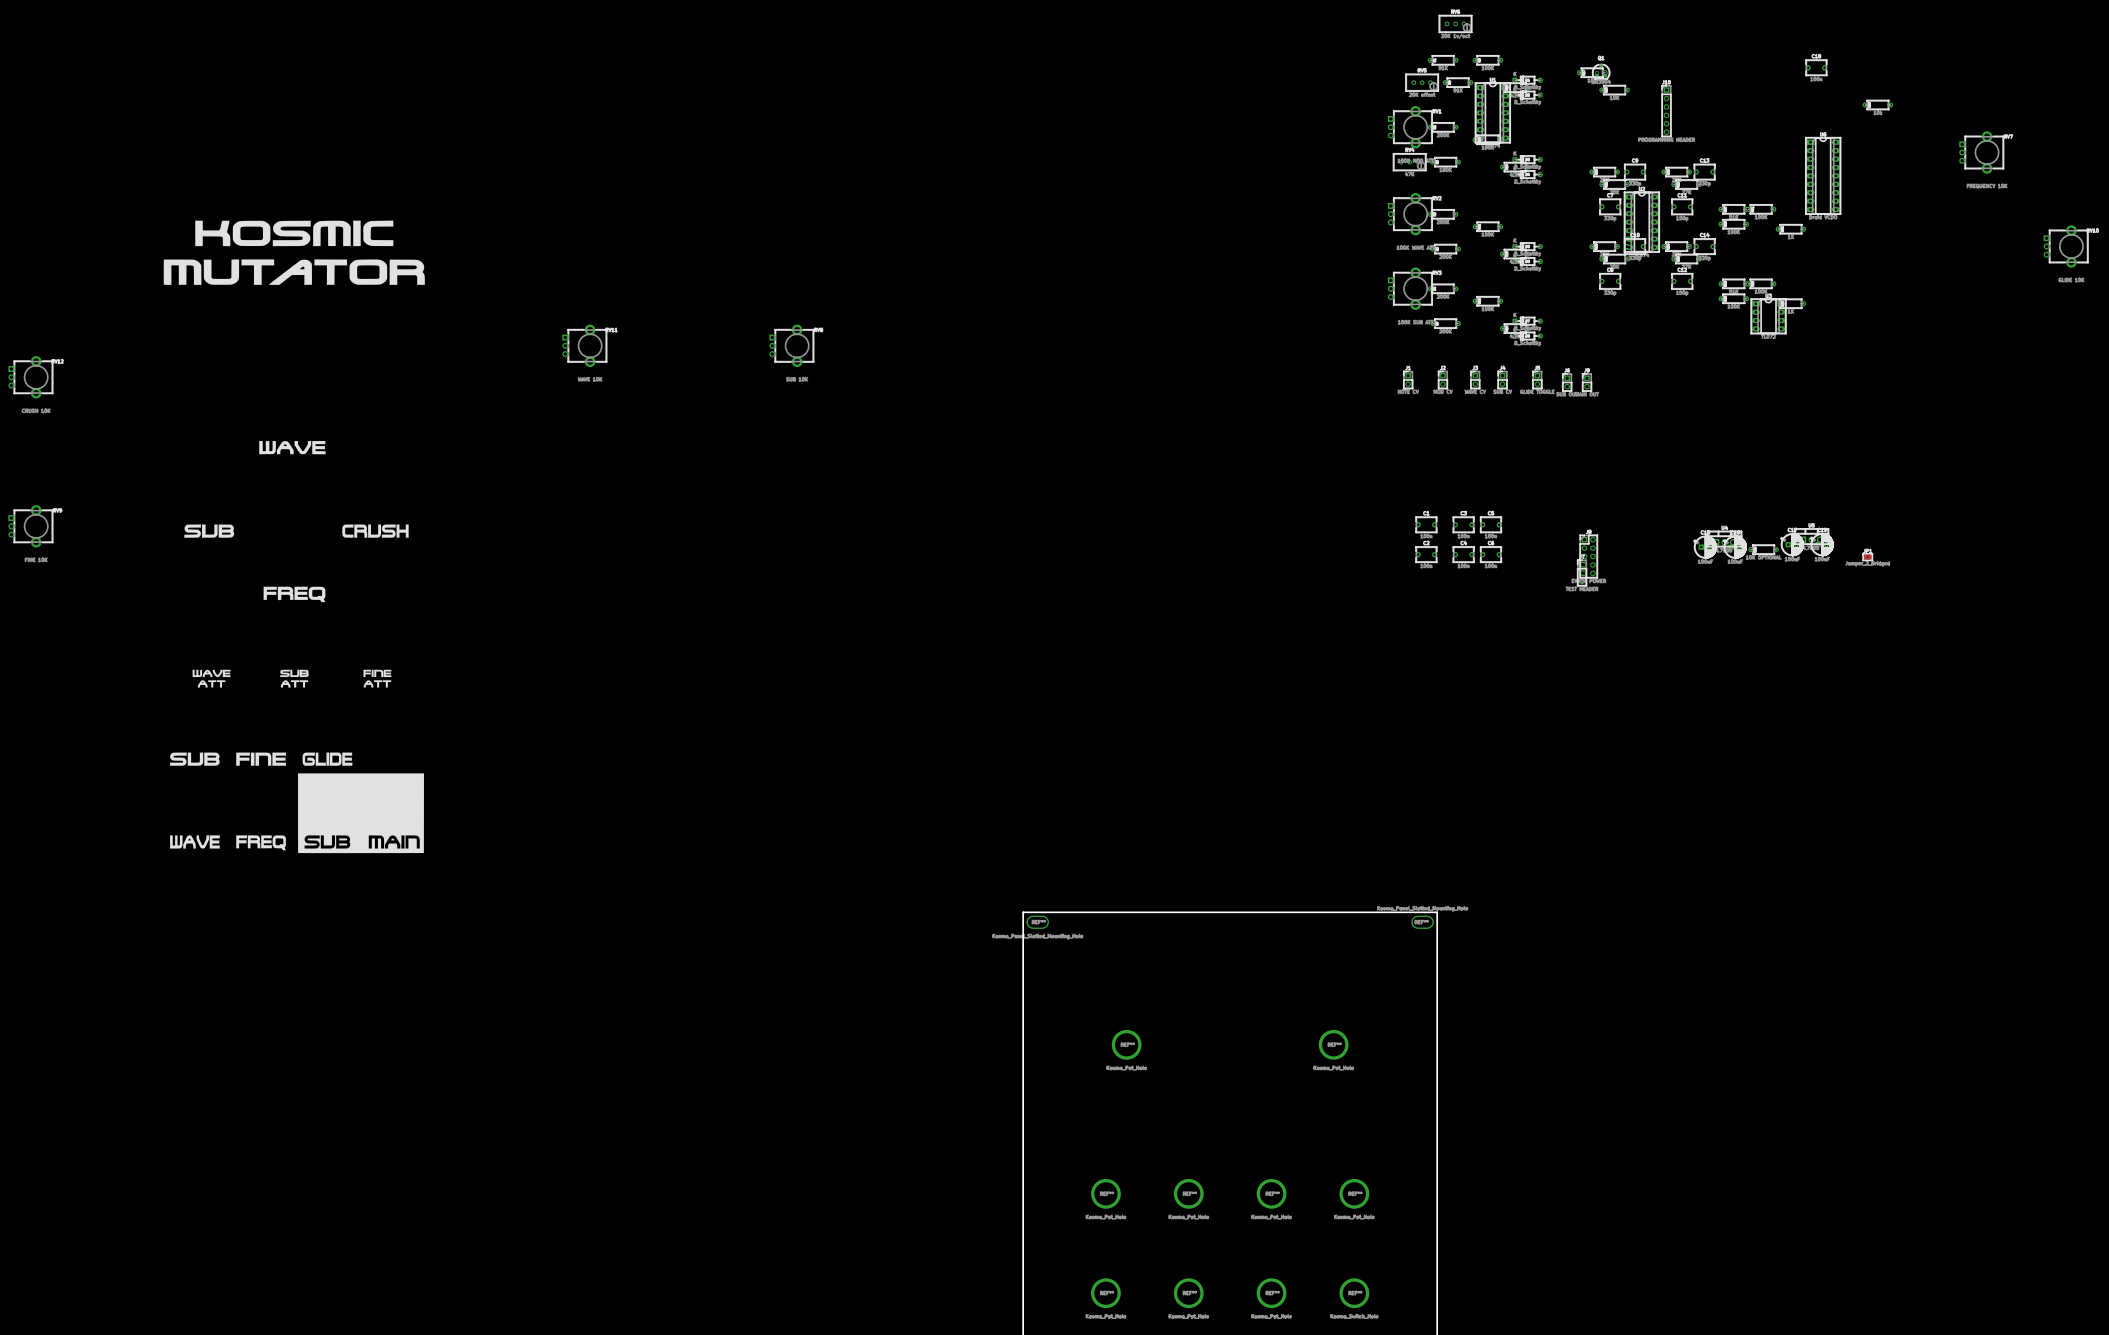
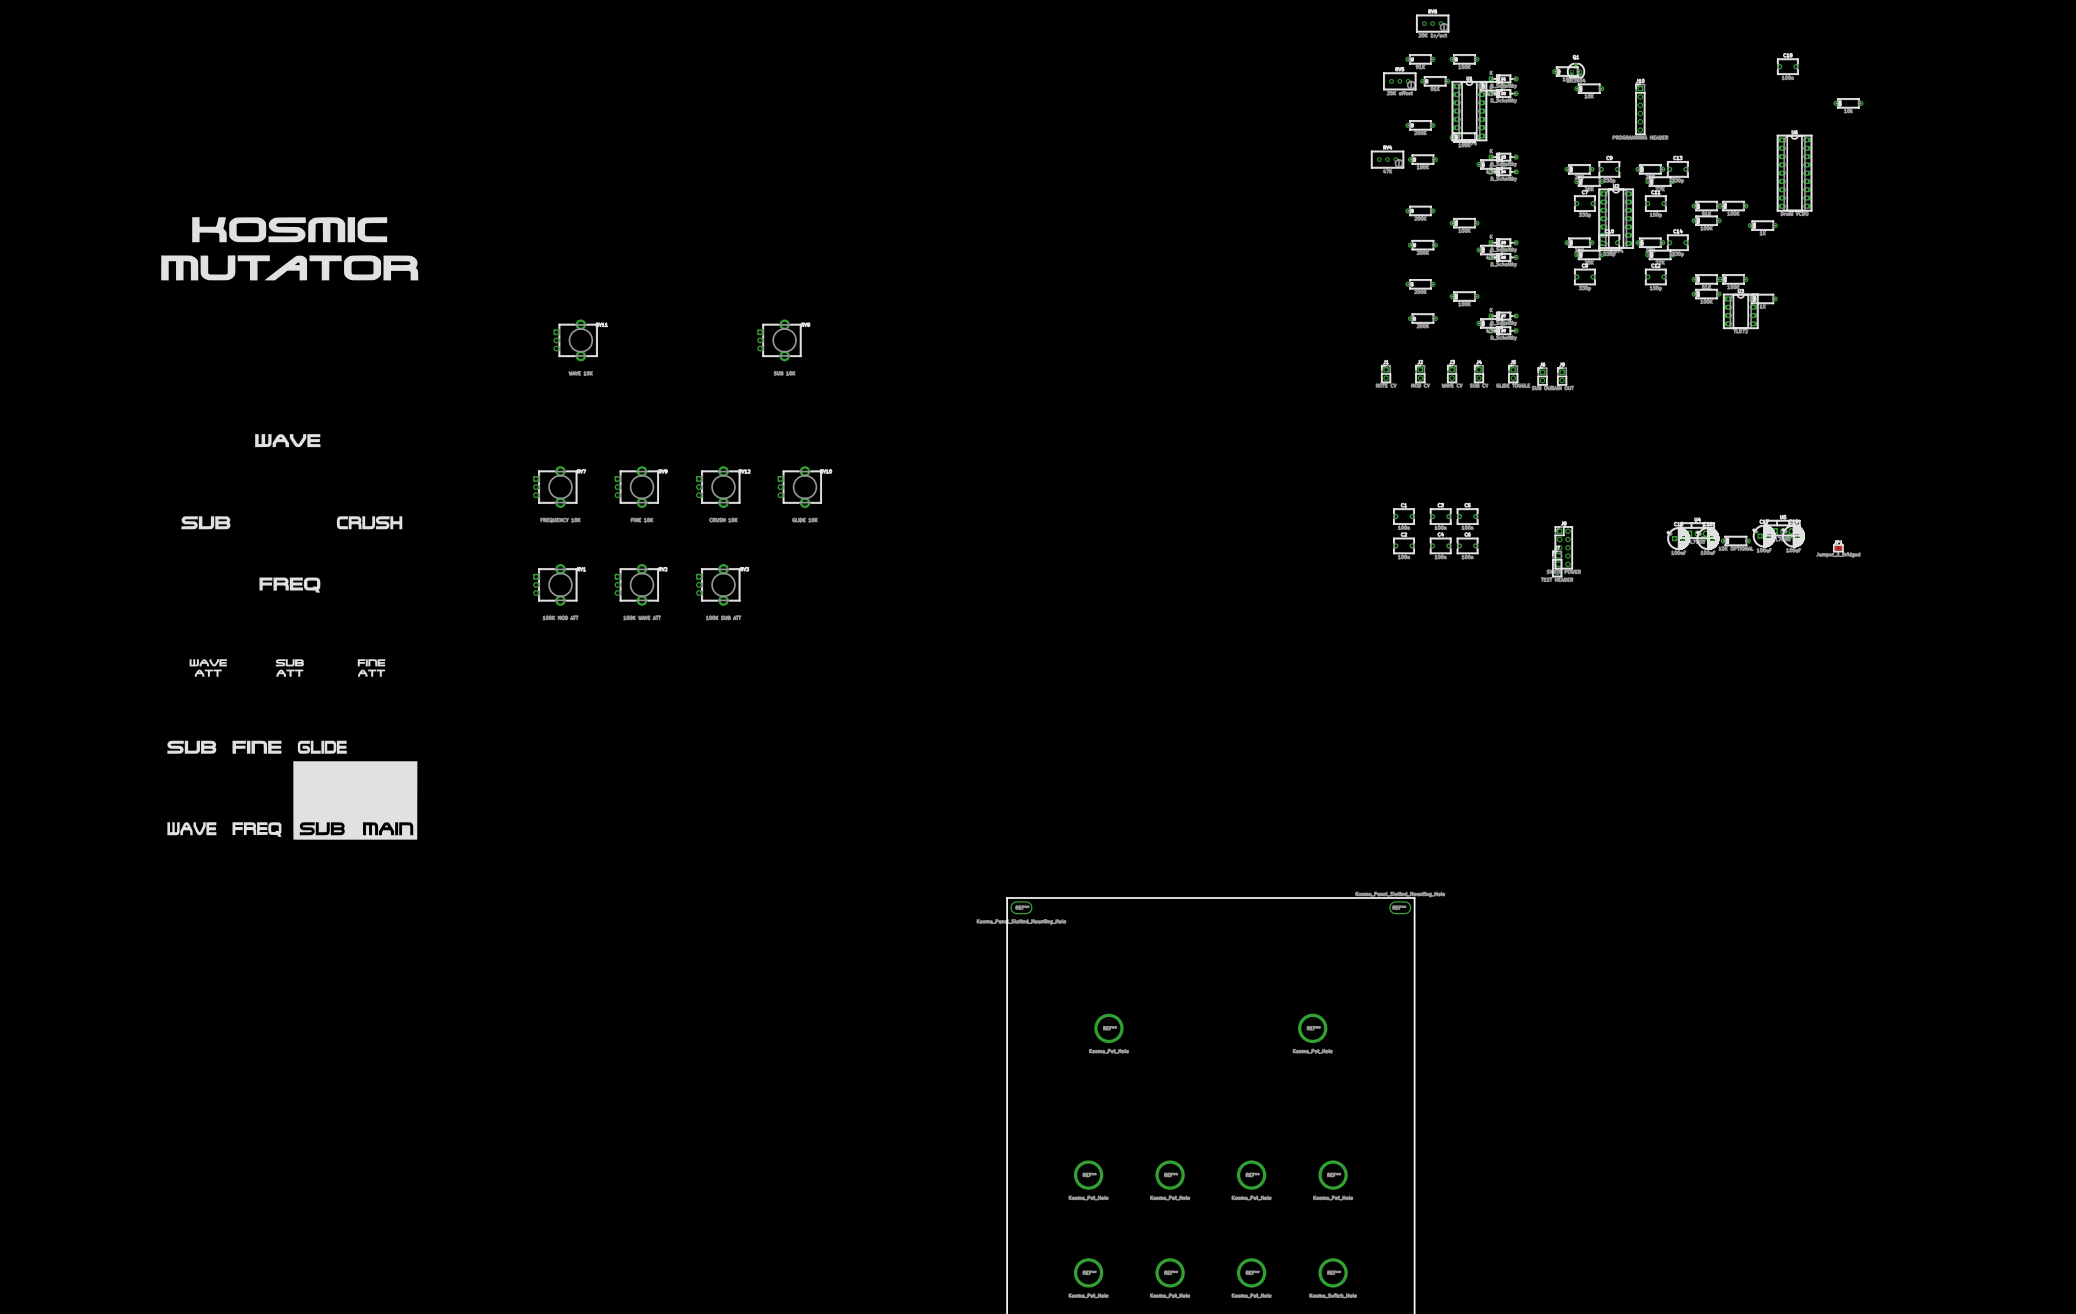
part position: (1410, 127) -> (555, 584)
part position: (1981, 152) -> (555, 487)
part position: (1410, 214) -> (636, 584)
part position: (2065, 246) -> (799, 487)
part position: (1410, 288) -> (718, 584)
part position: (30, 377) -> (718, 487)
part position: (30, 526) -> (636, 487)

